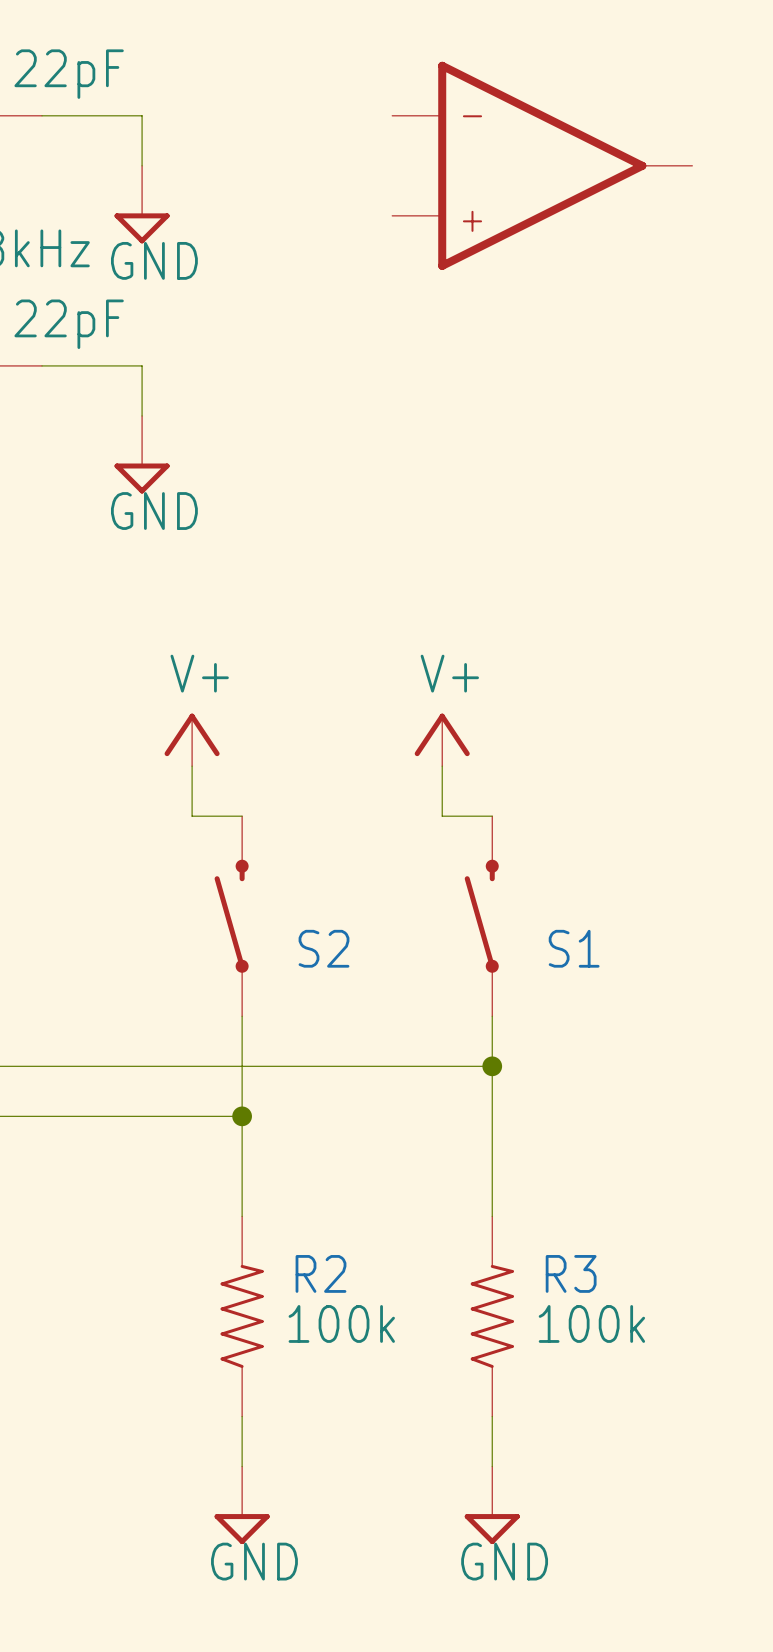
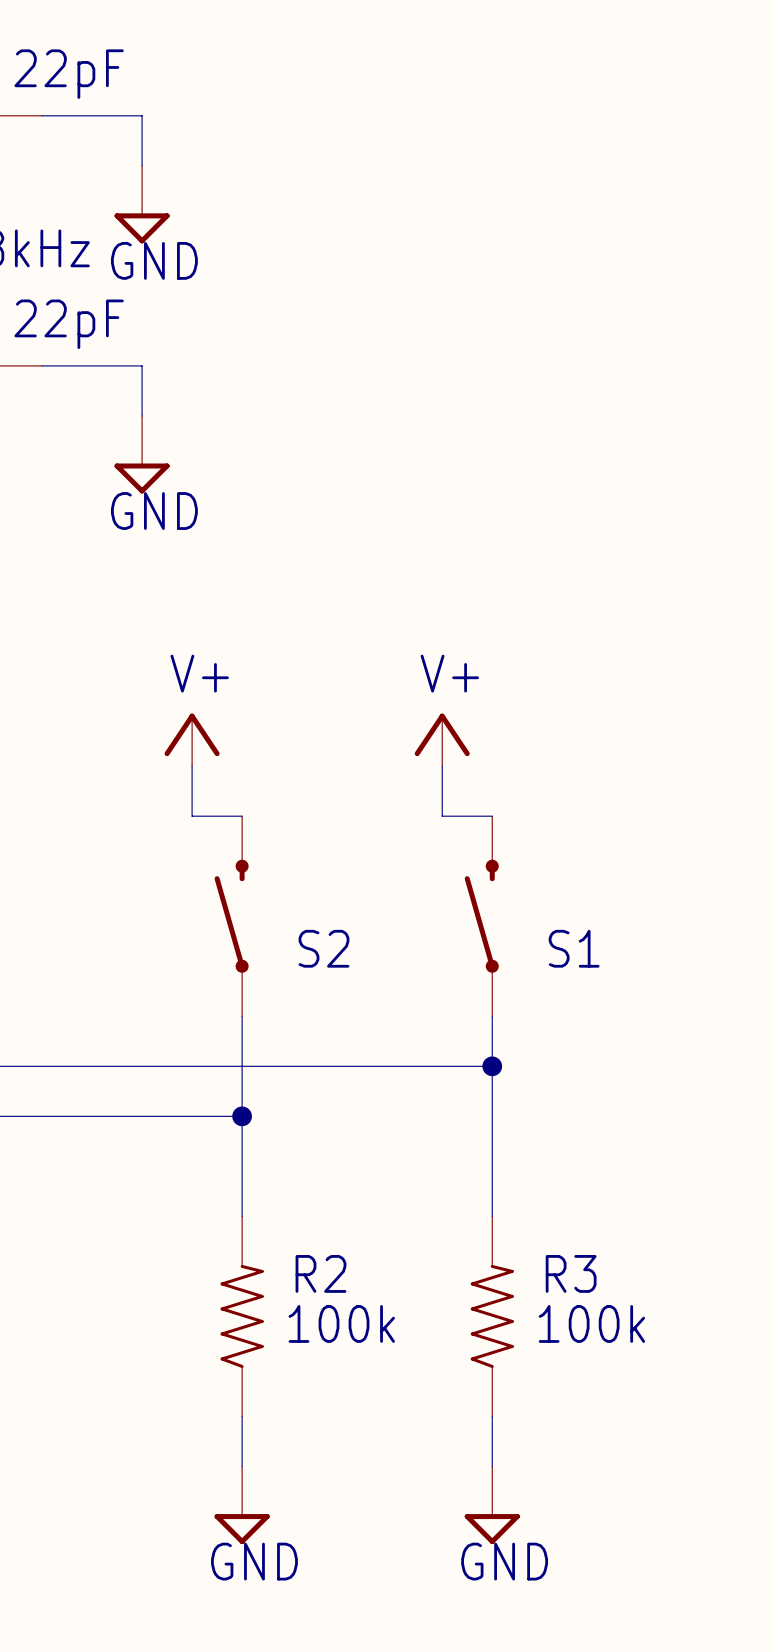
part: (542, 165) -> none

